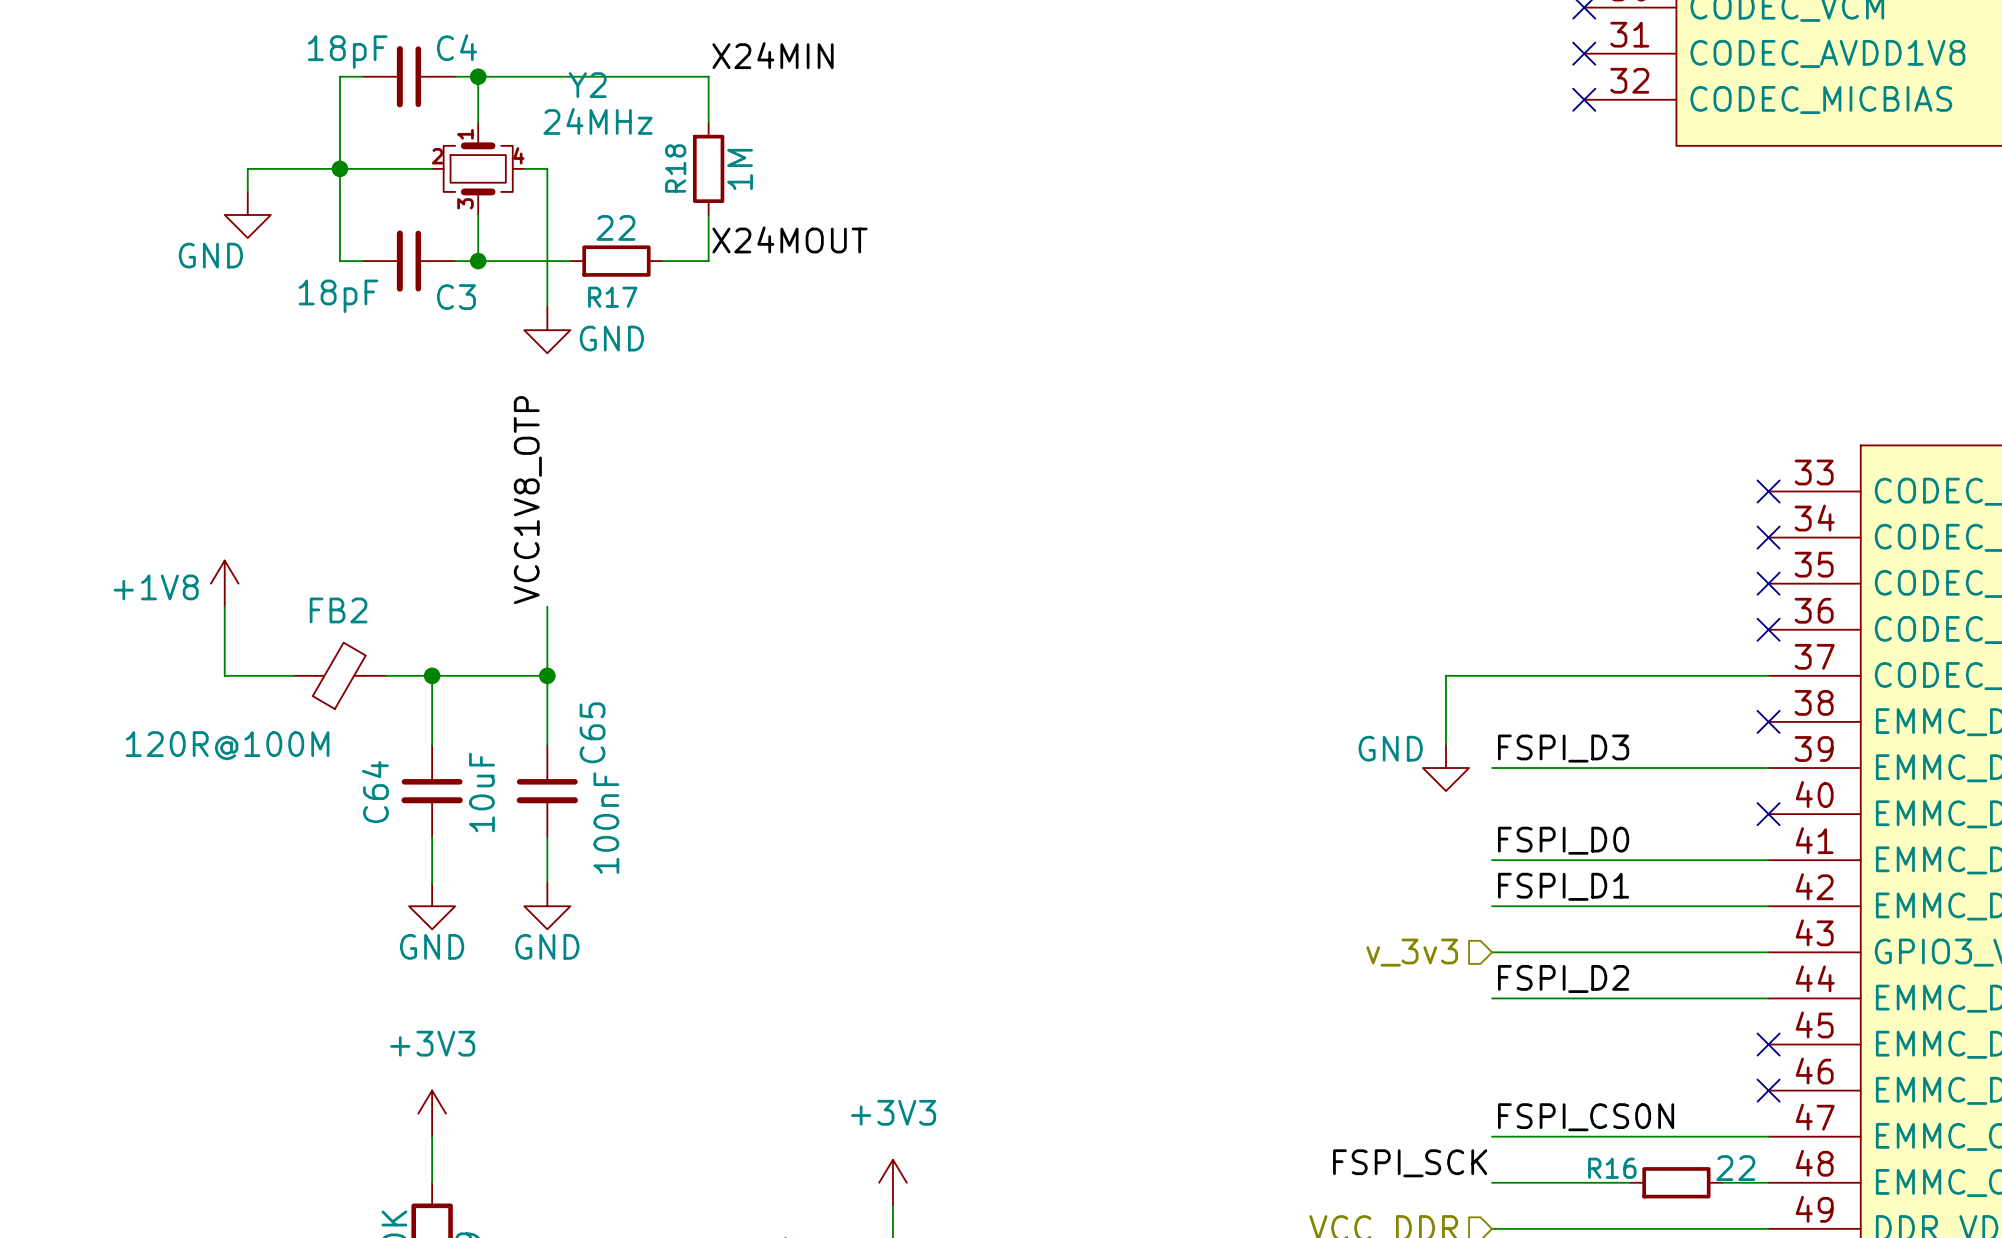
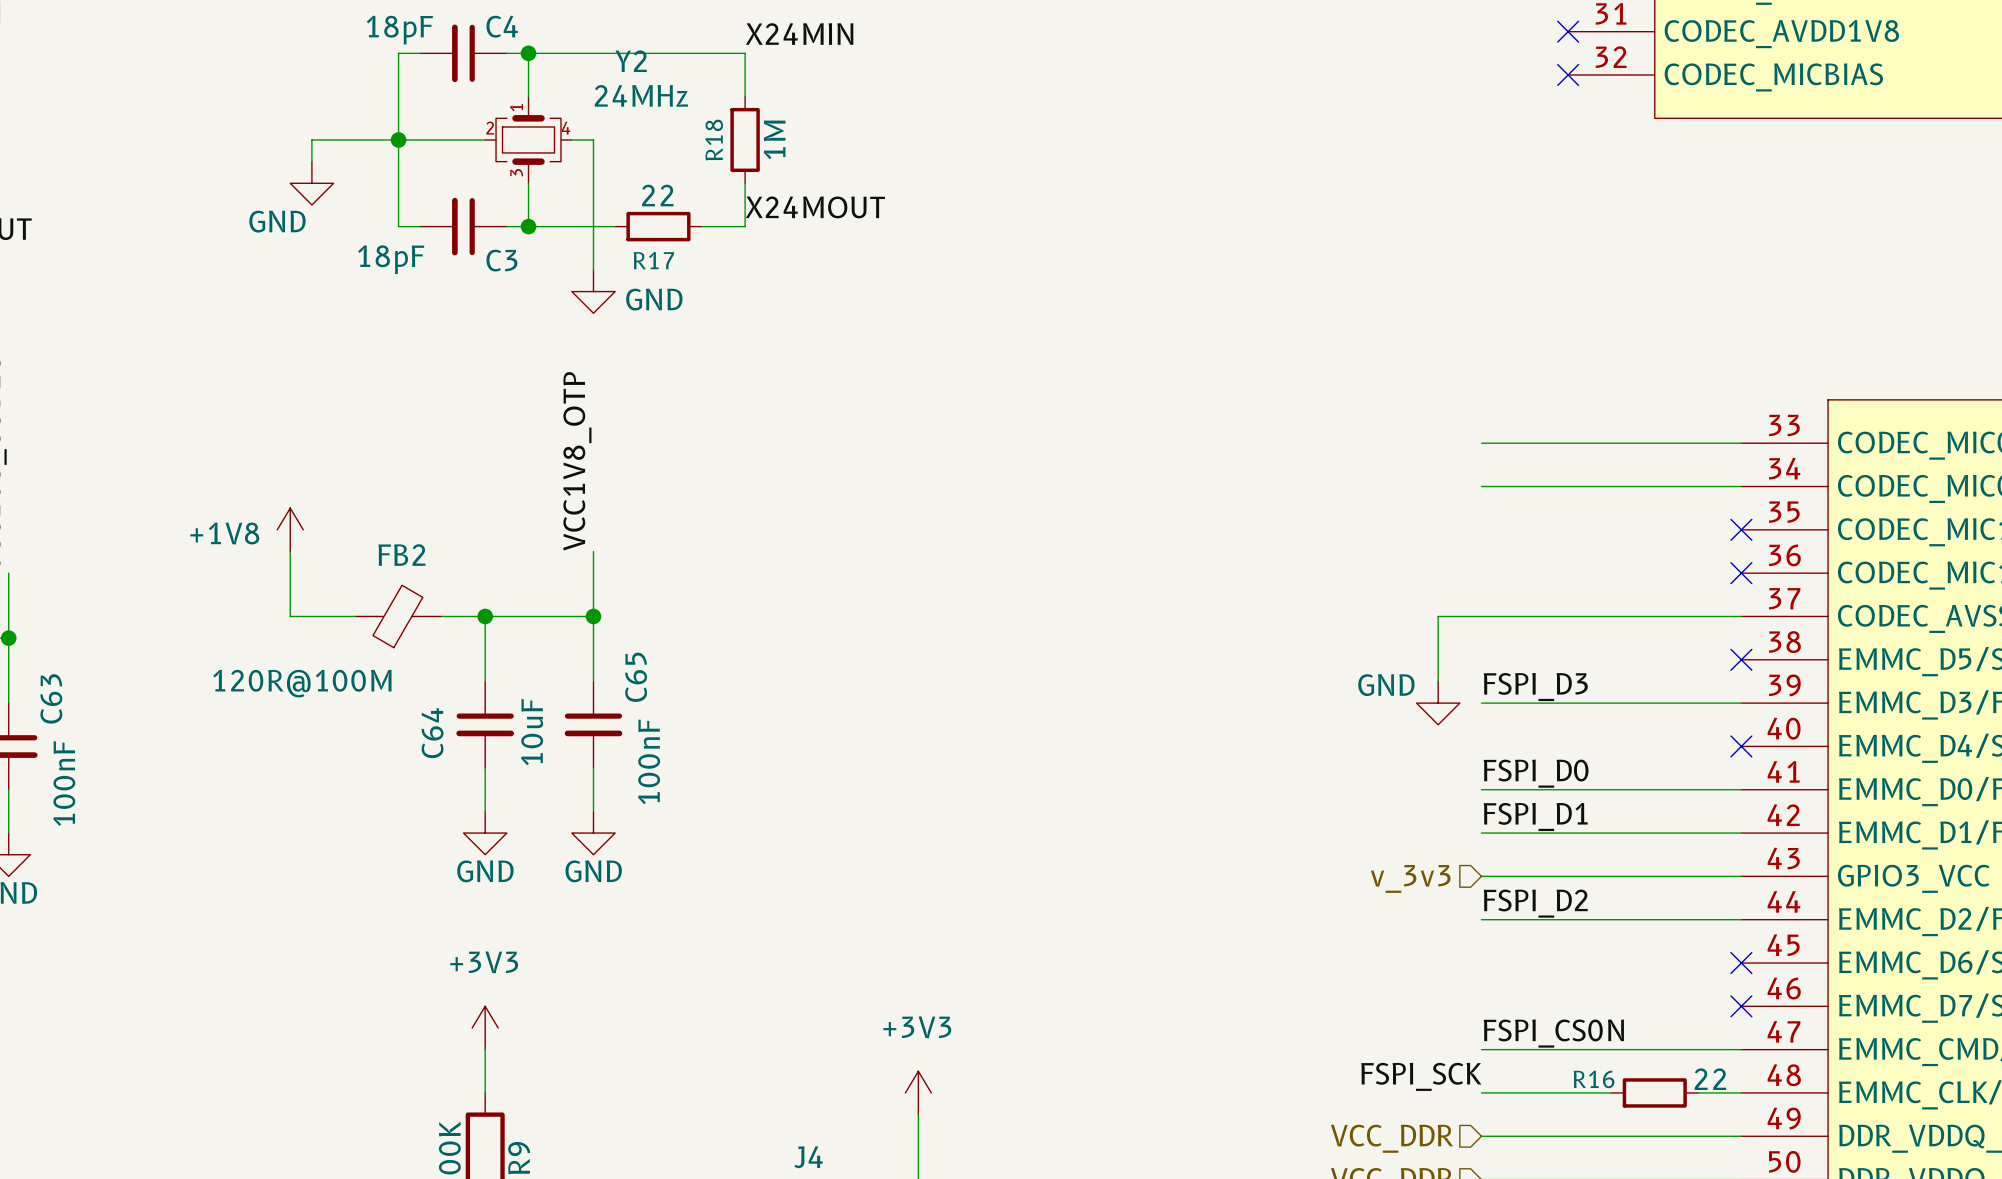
wire: none -> (1481, 443) (1741, 443)
no-connect mark: (1768, 491) -> none
wire: none -> (1481, 486) (1741, 486)
no-connect mark: (1768, 537) -> none

